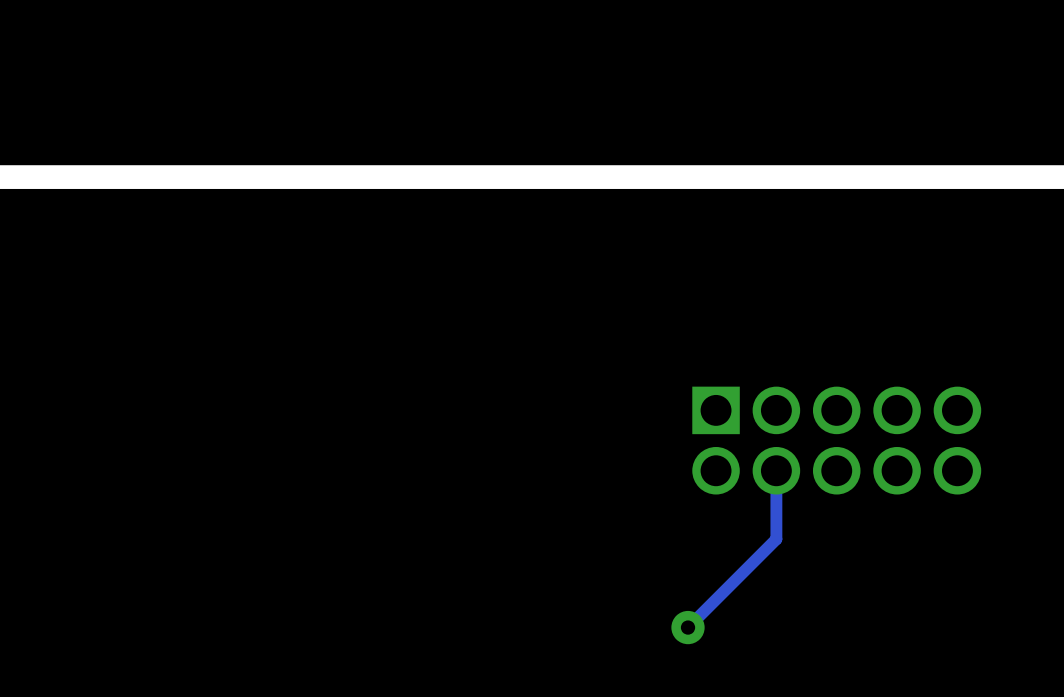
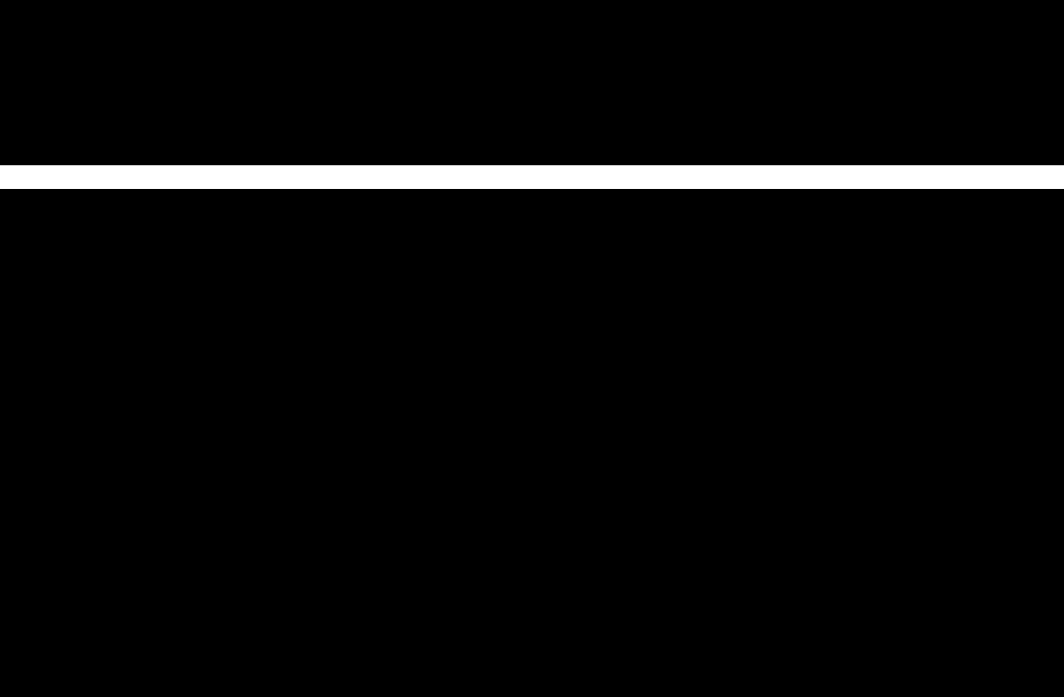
part: (836, 440) -> none
track: (776, 470) (776, 539) (688, 627) -> none
via: (688, 627) -> none

